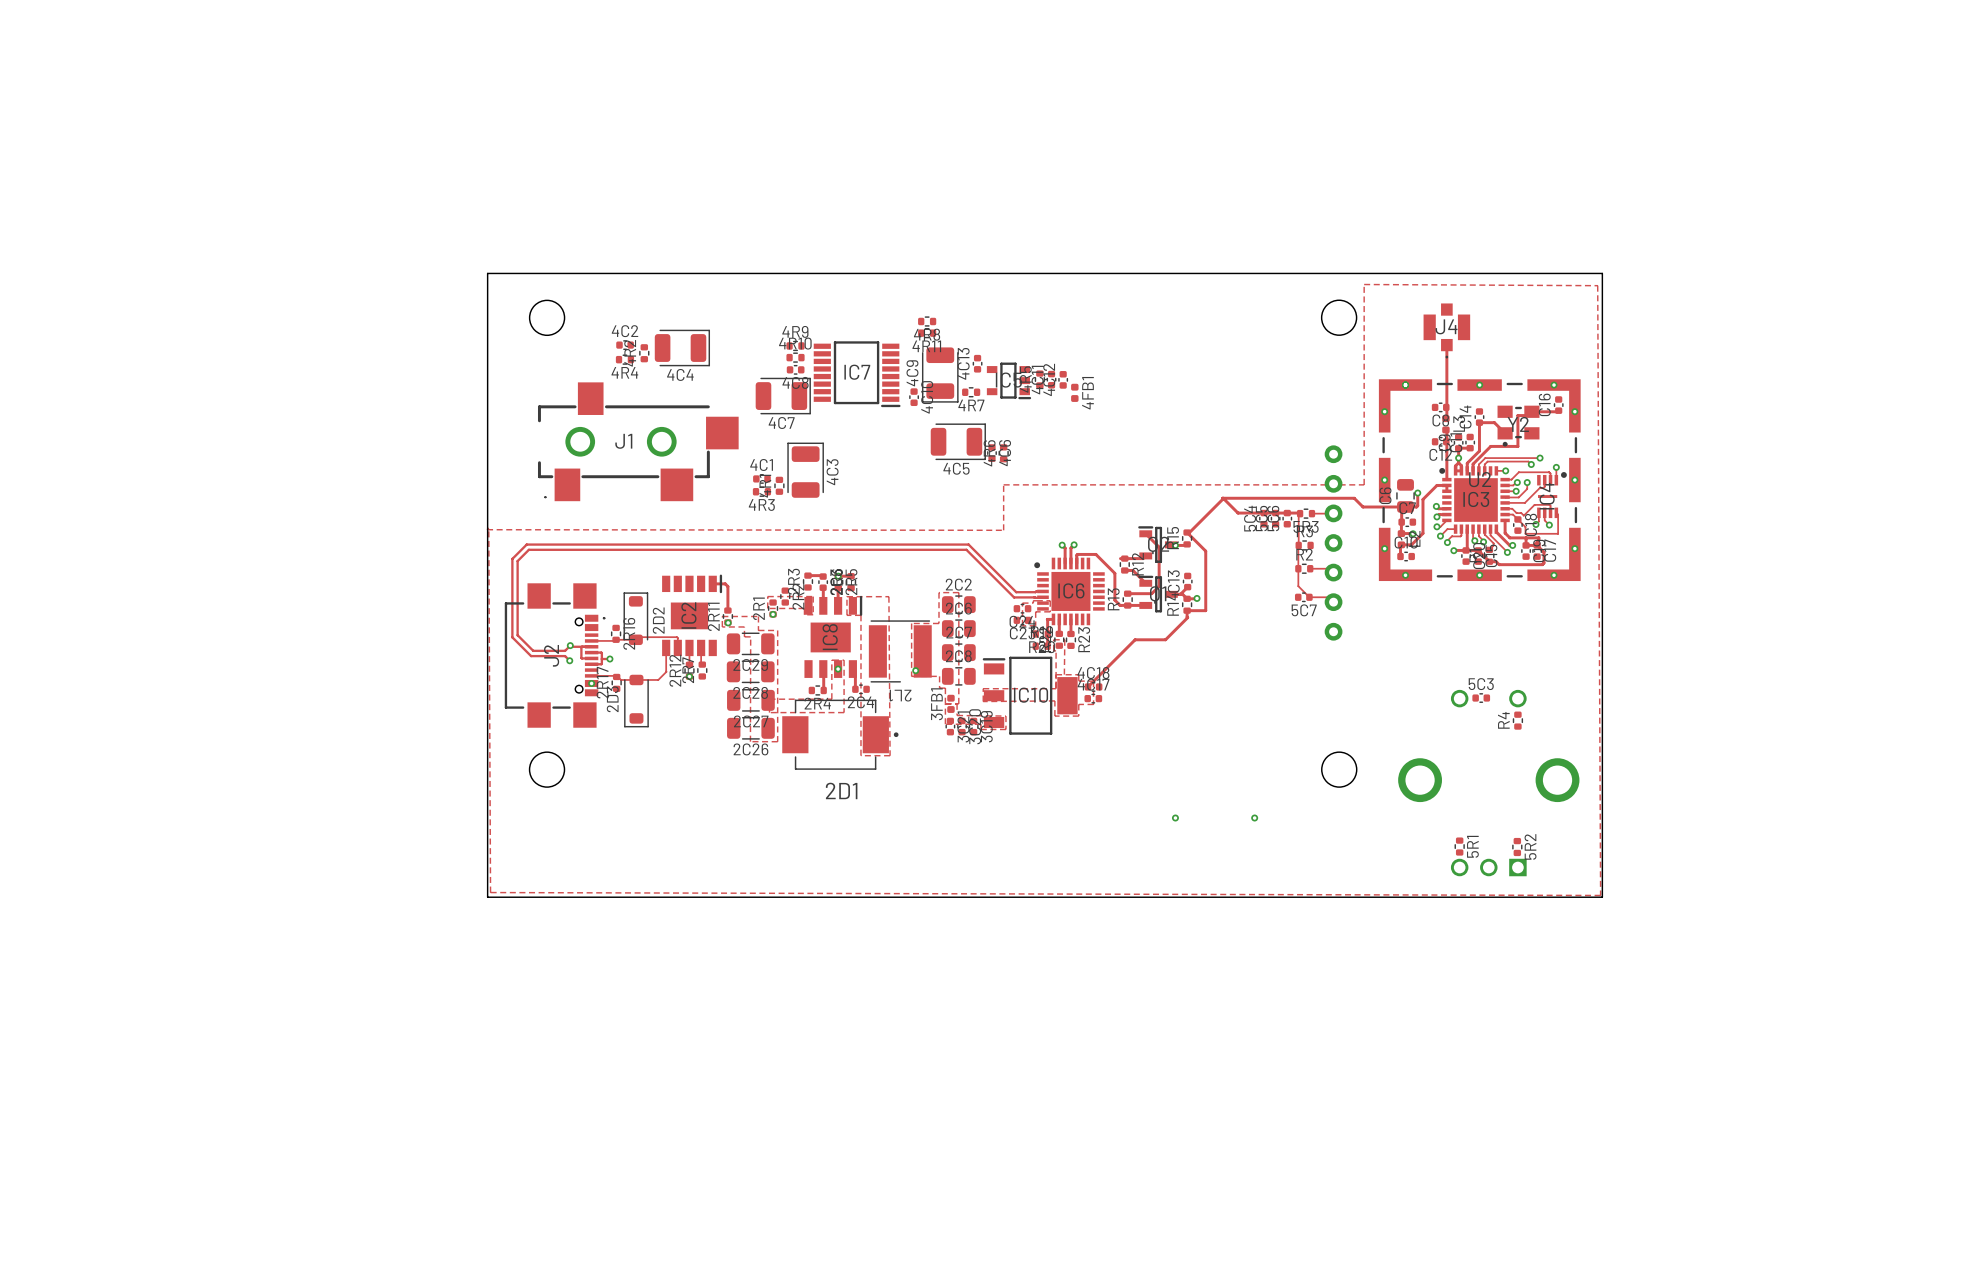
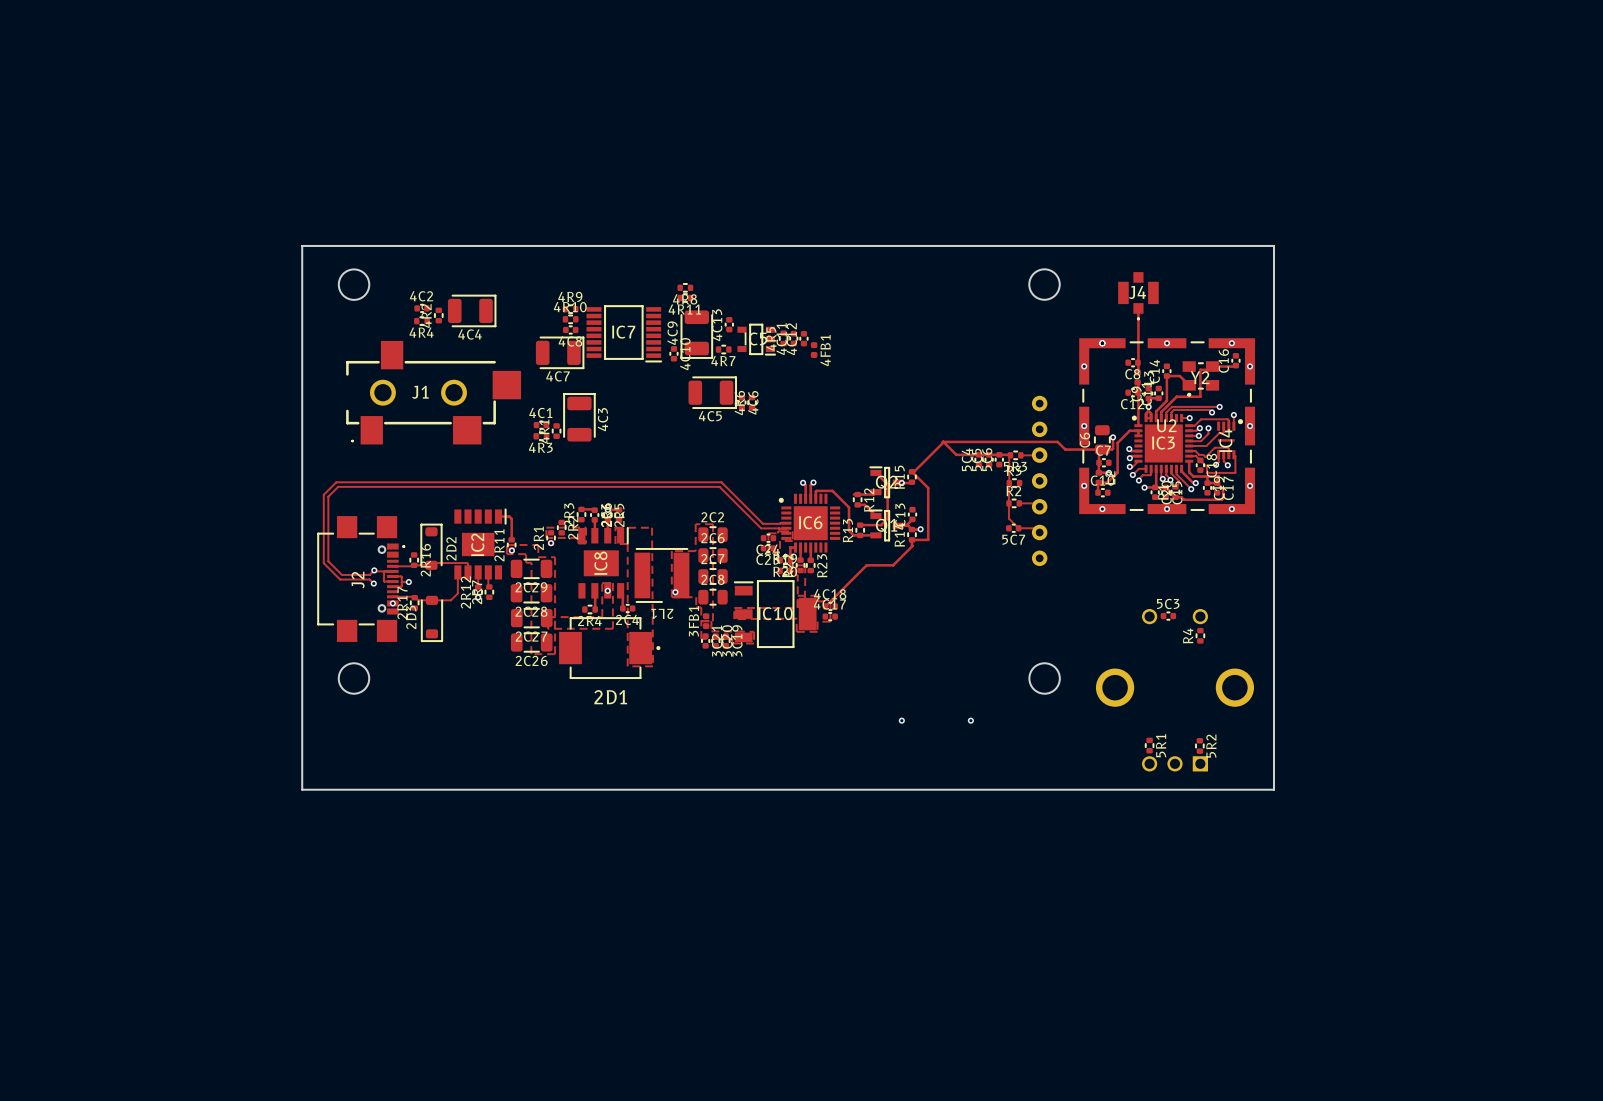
zone outline: (1364, 284) (1364, 484) (1003, 484) (1003, 530) (487, 529) (488, 527) (490, 892) (1600, 895) (1597, 285) (1364, 284) -> none

